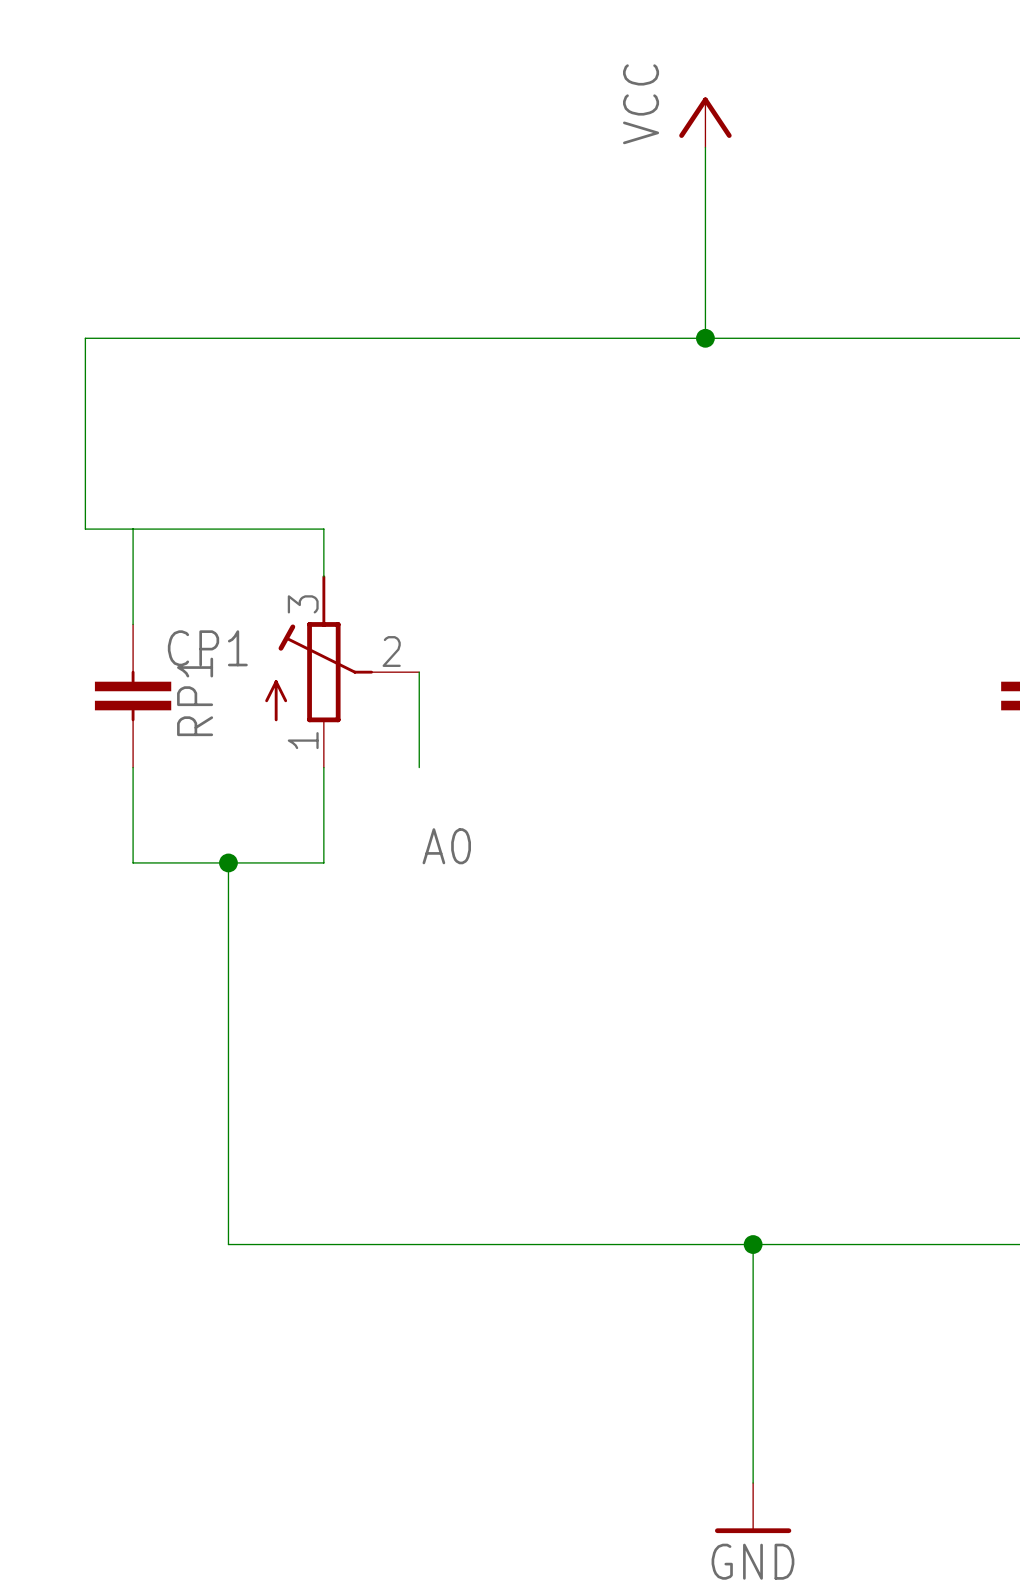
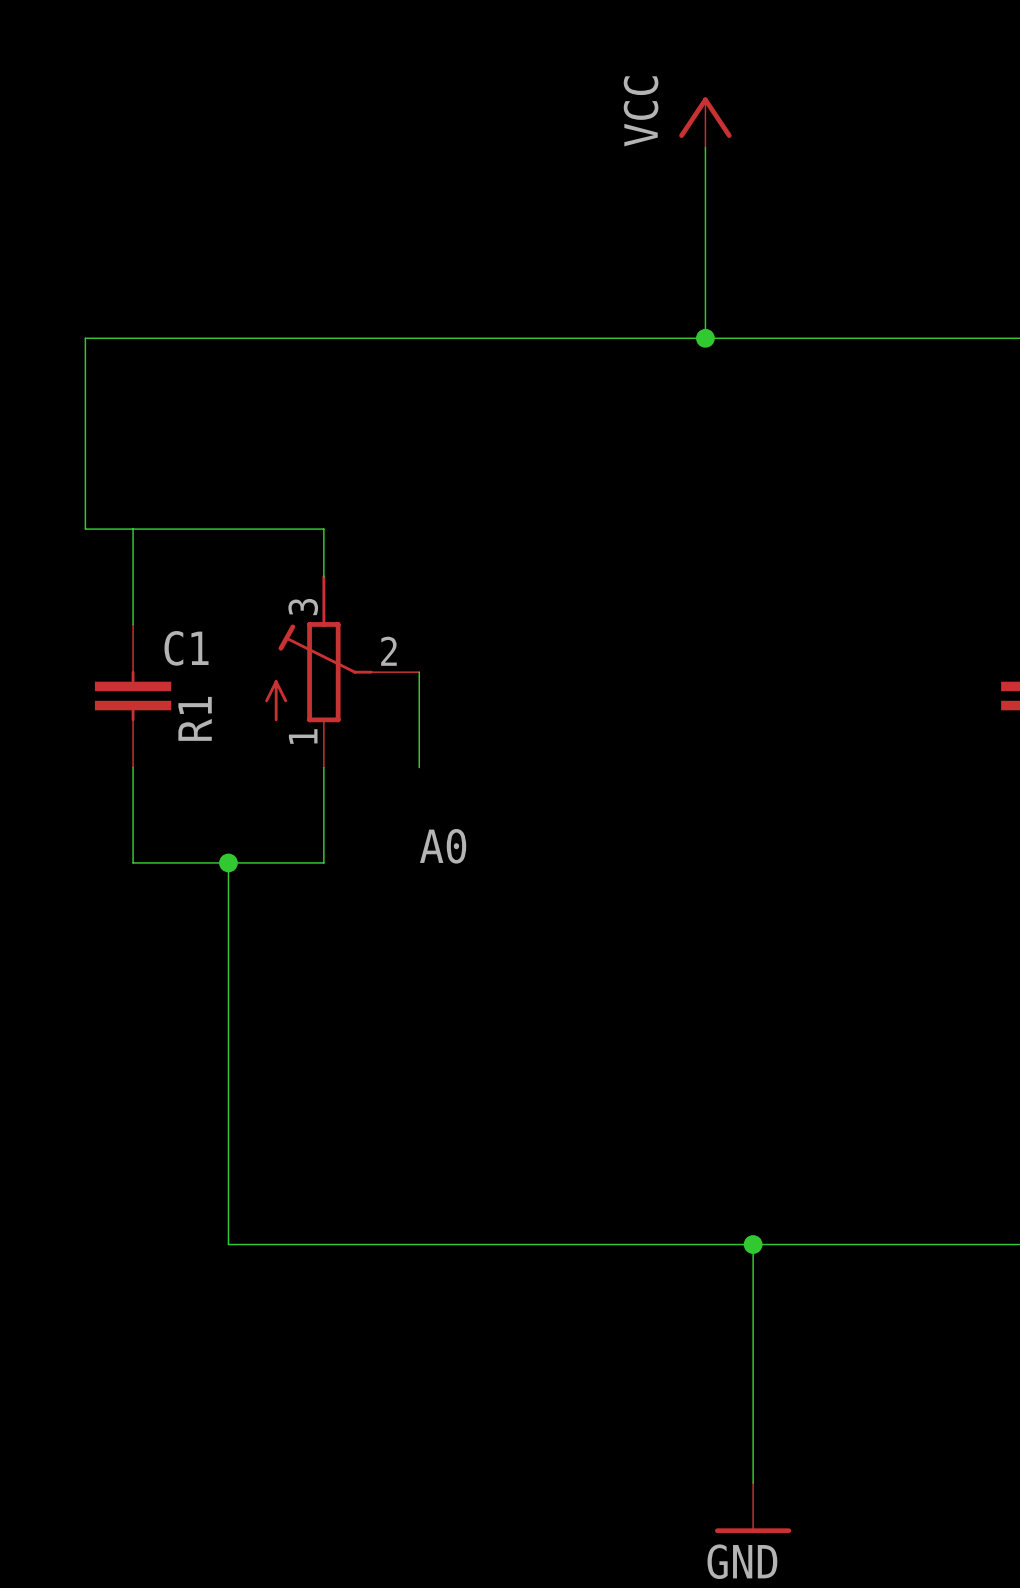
CP1 name: CP1 (207, 648) -> C1 (186, 648)
RP1 name: RP1 (195, 696) -> R1 (195, 718)

